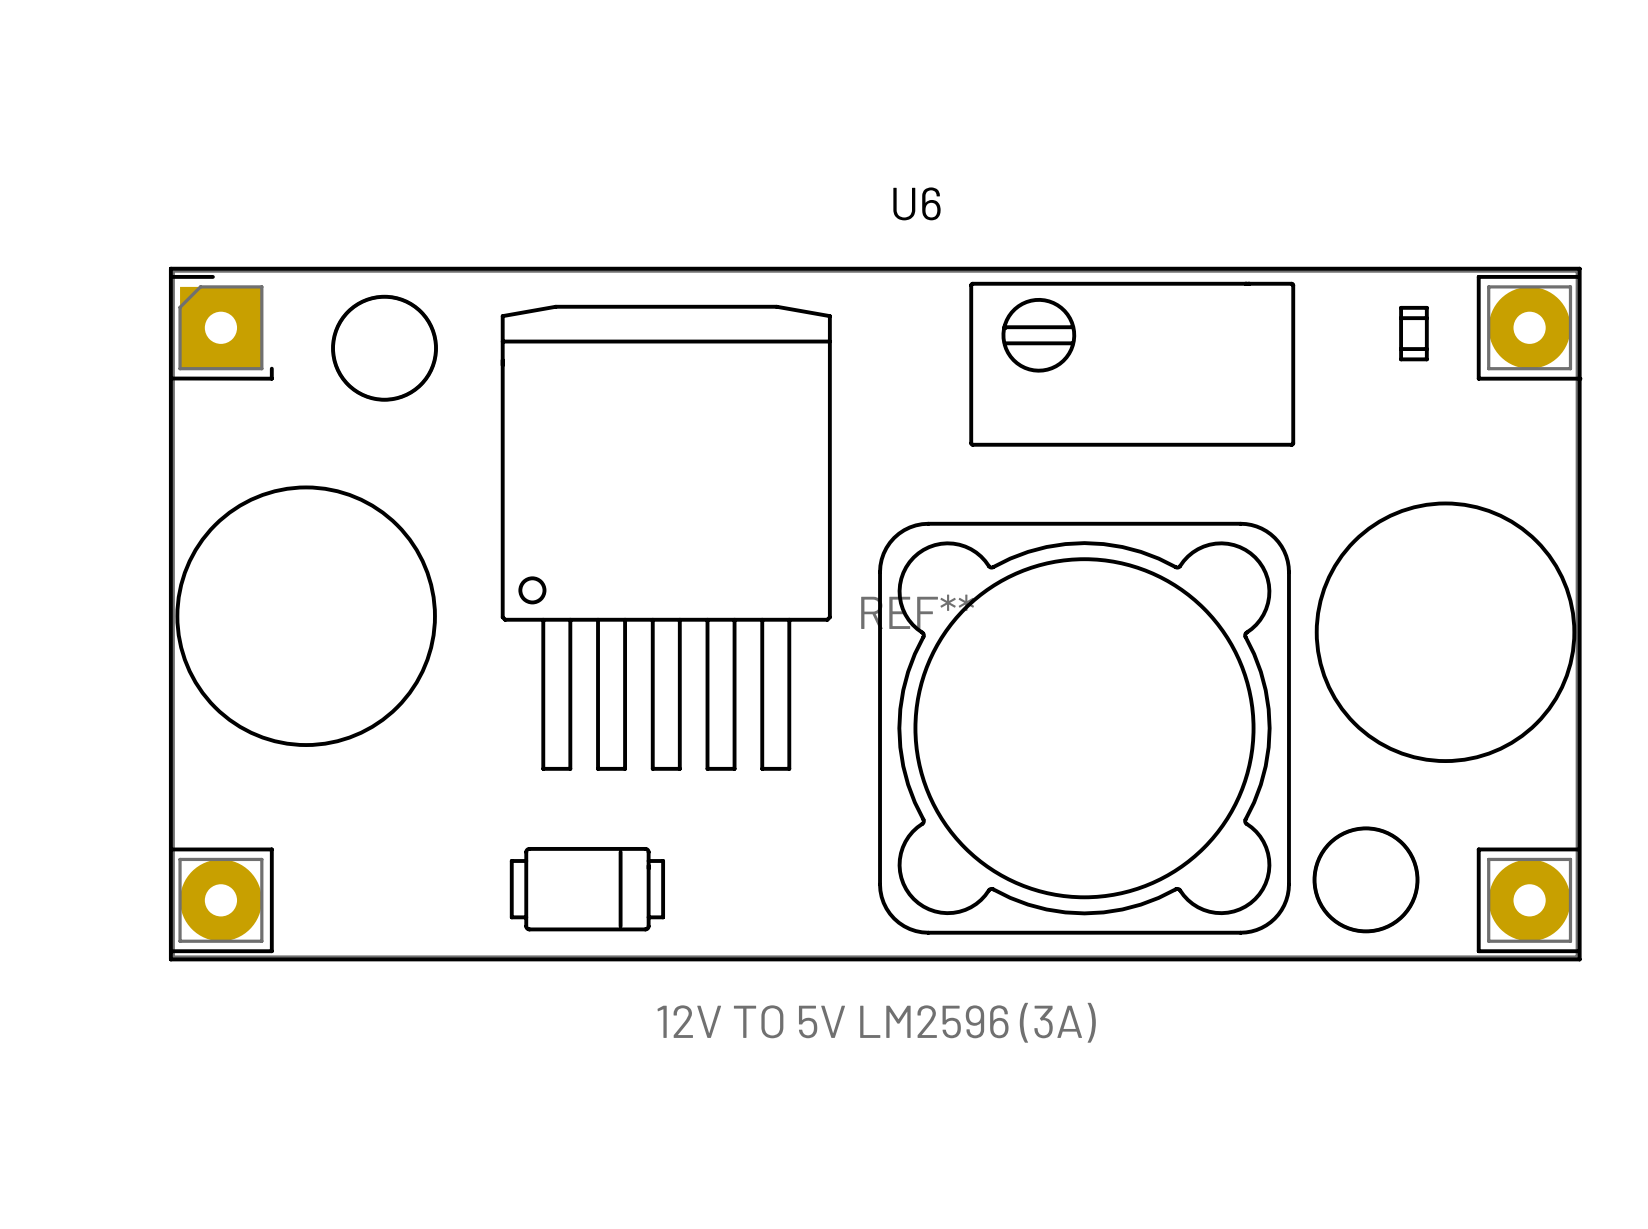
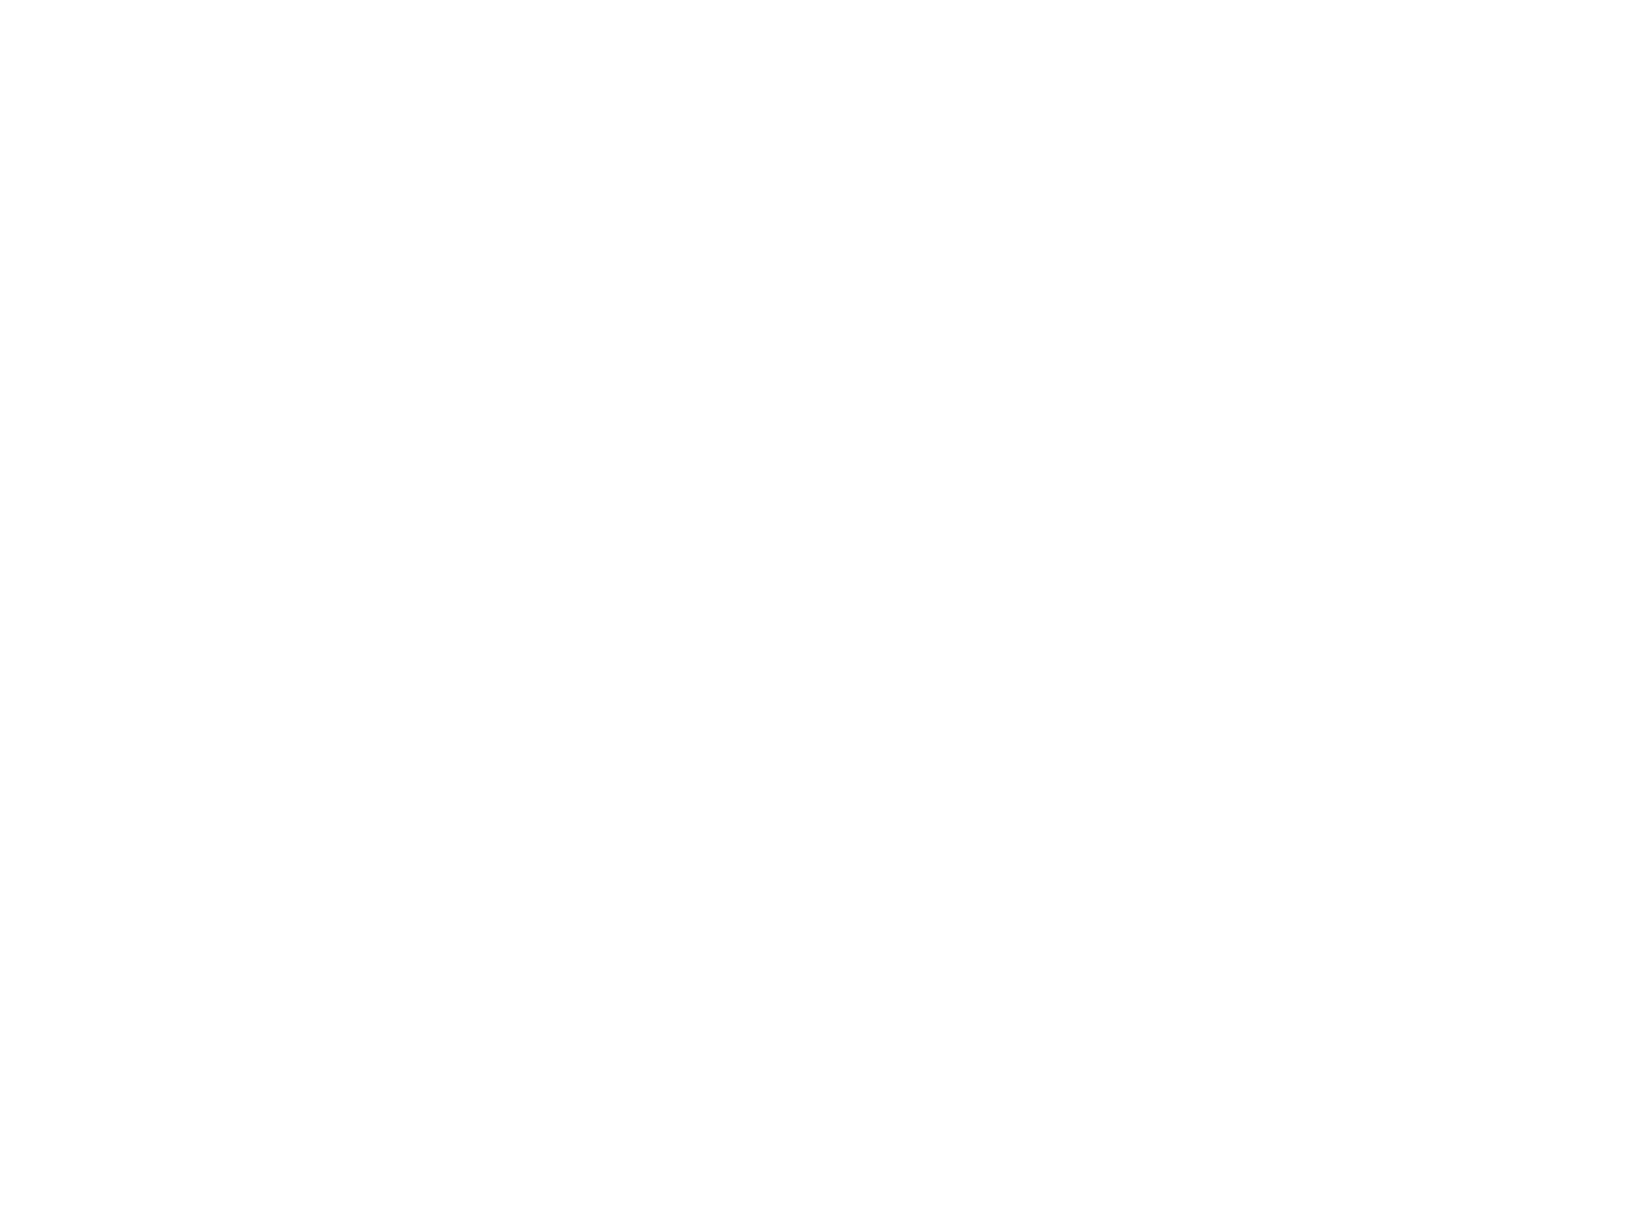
U6: 12V TO 5V LM2596 (3A) (875, 614) -> none

